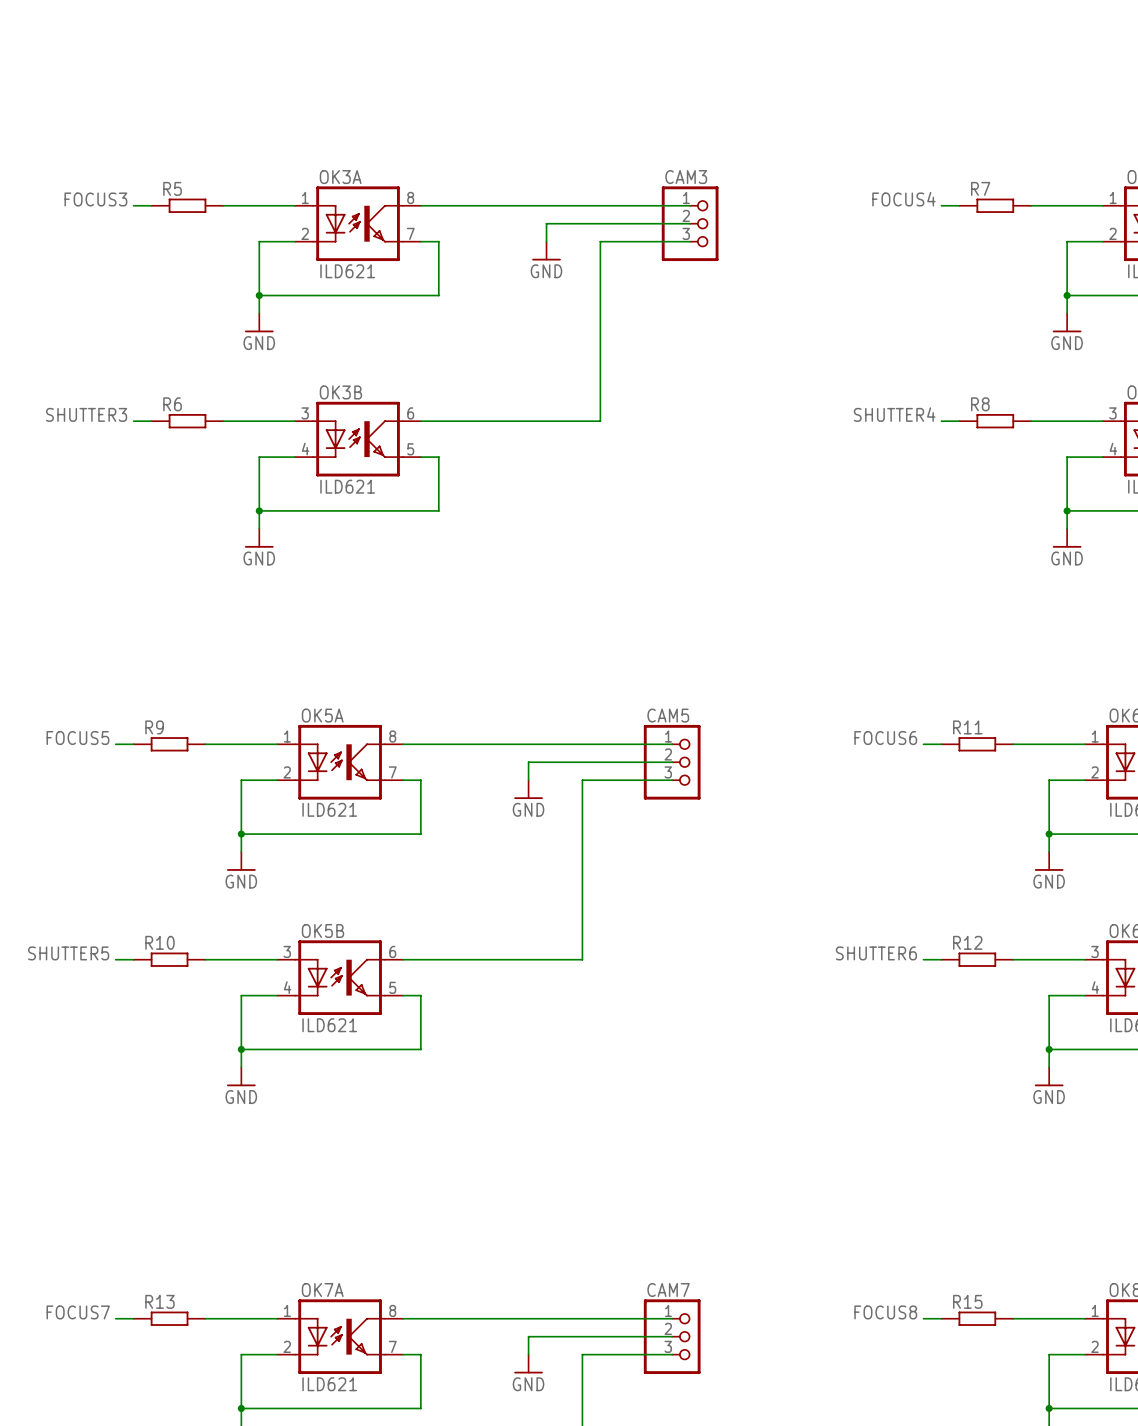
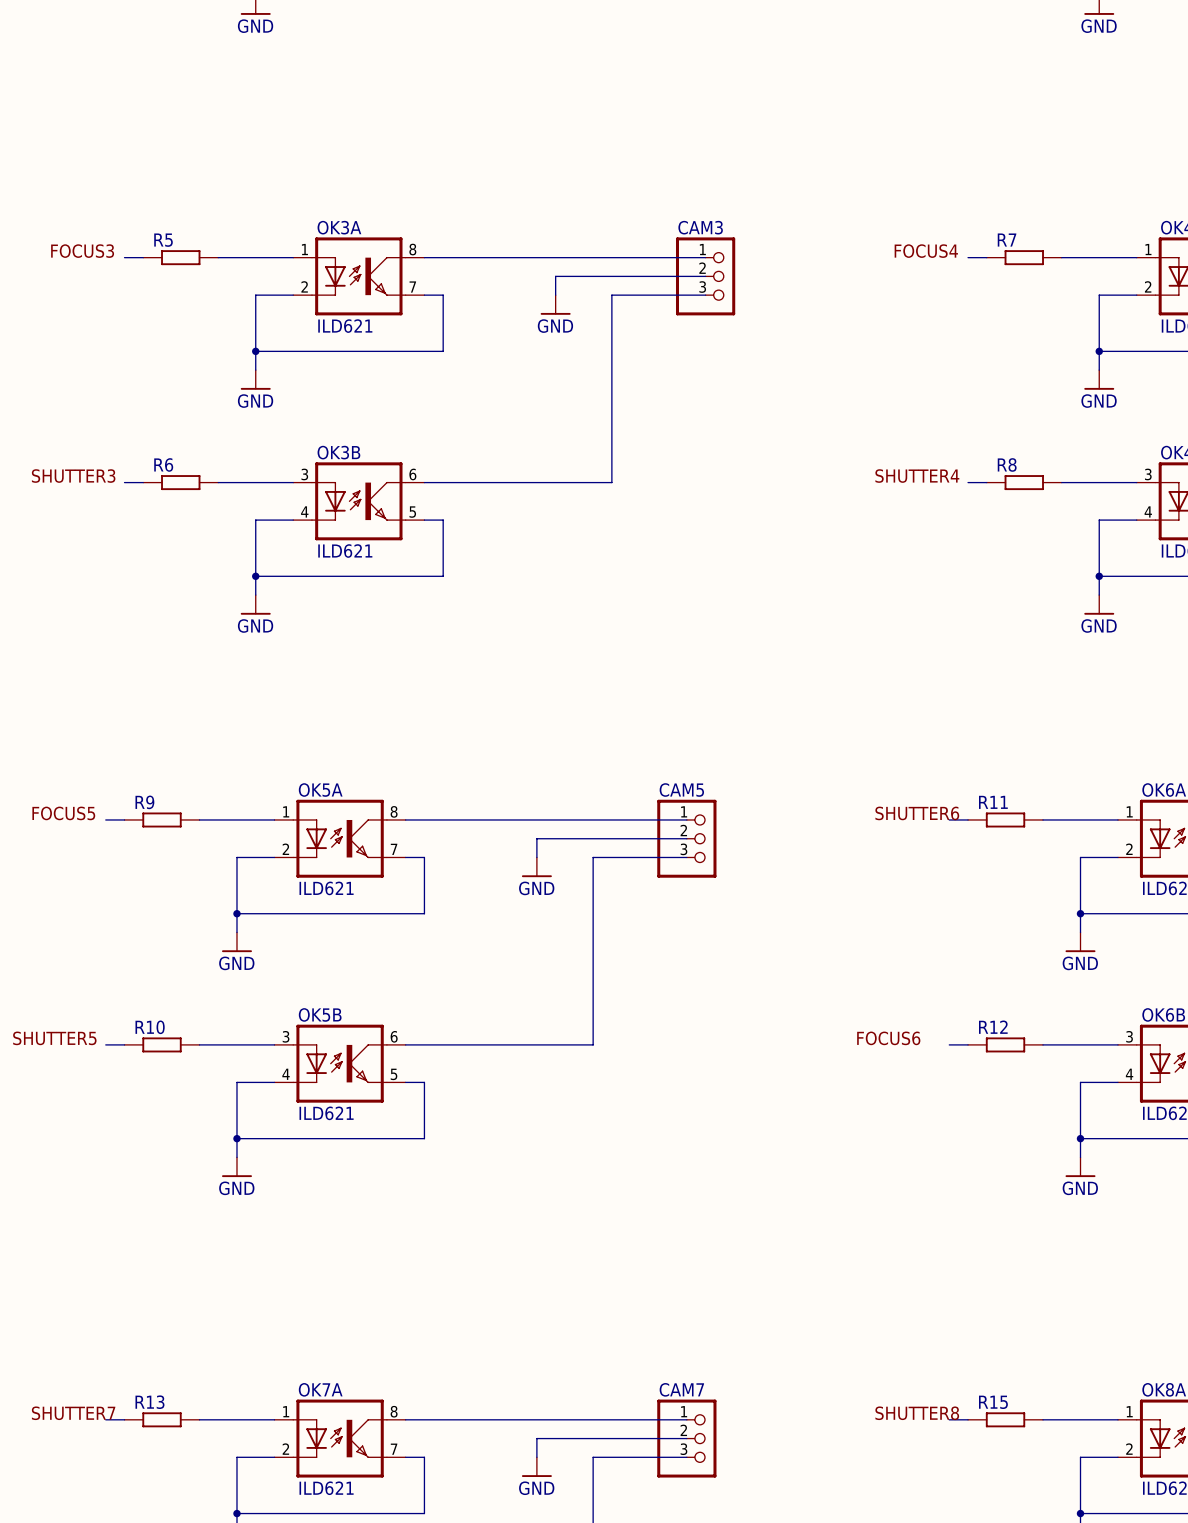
label: FOCUS6 (885, 738) -> SHUTTER6 (917, 813)
label: SHUTTER6 (876, 953) -> FOCUS6 (888, 1038)
label: FOCUS7 (78, 1312) -> SHUTTER7 (73, 1413)
label: FOCUS8 (885, 1312) -> SHUTTER8 (917, 1413)

